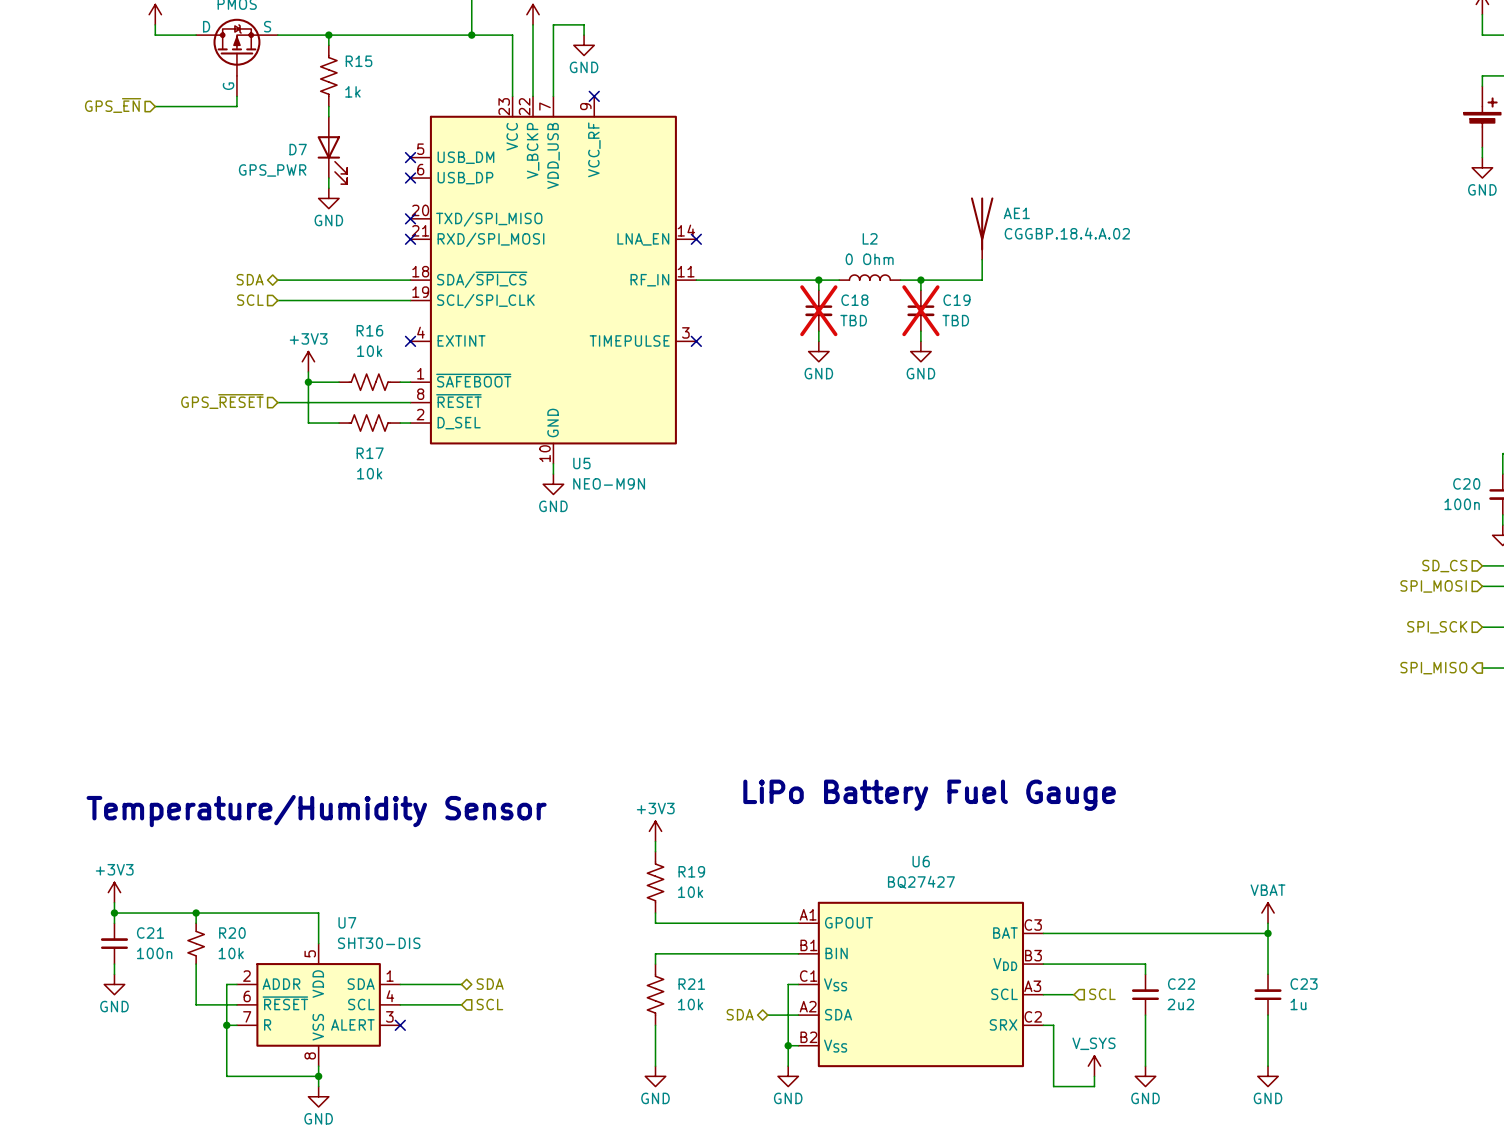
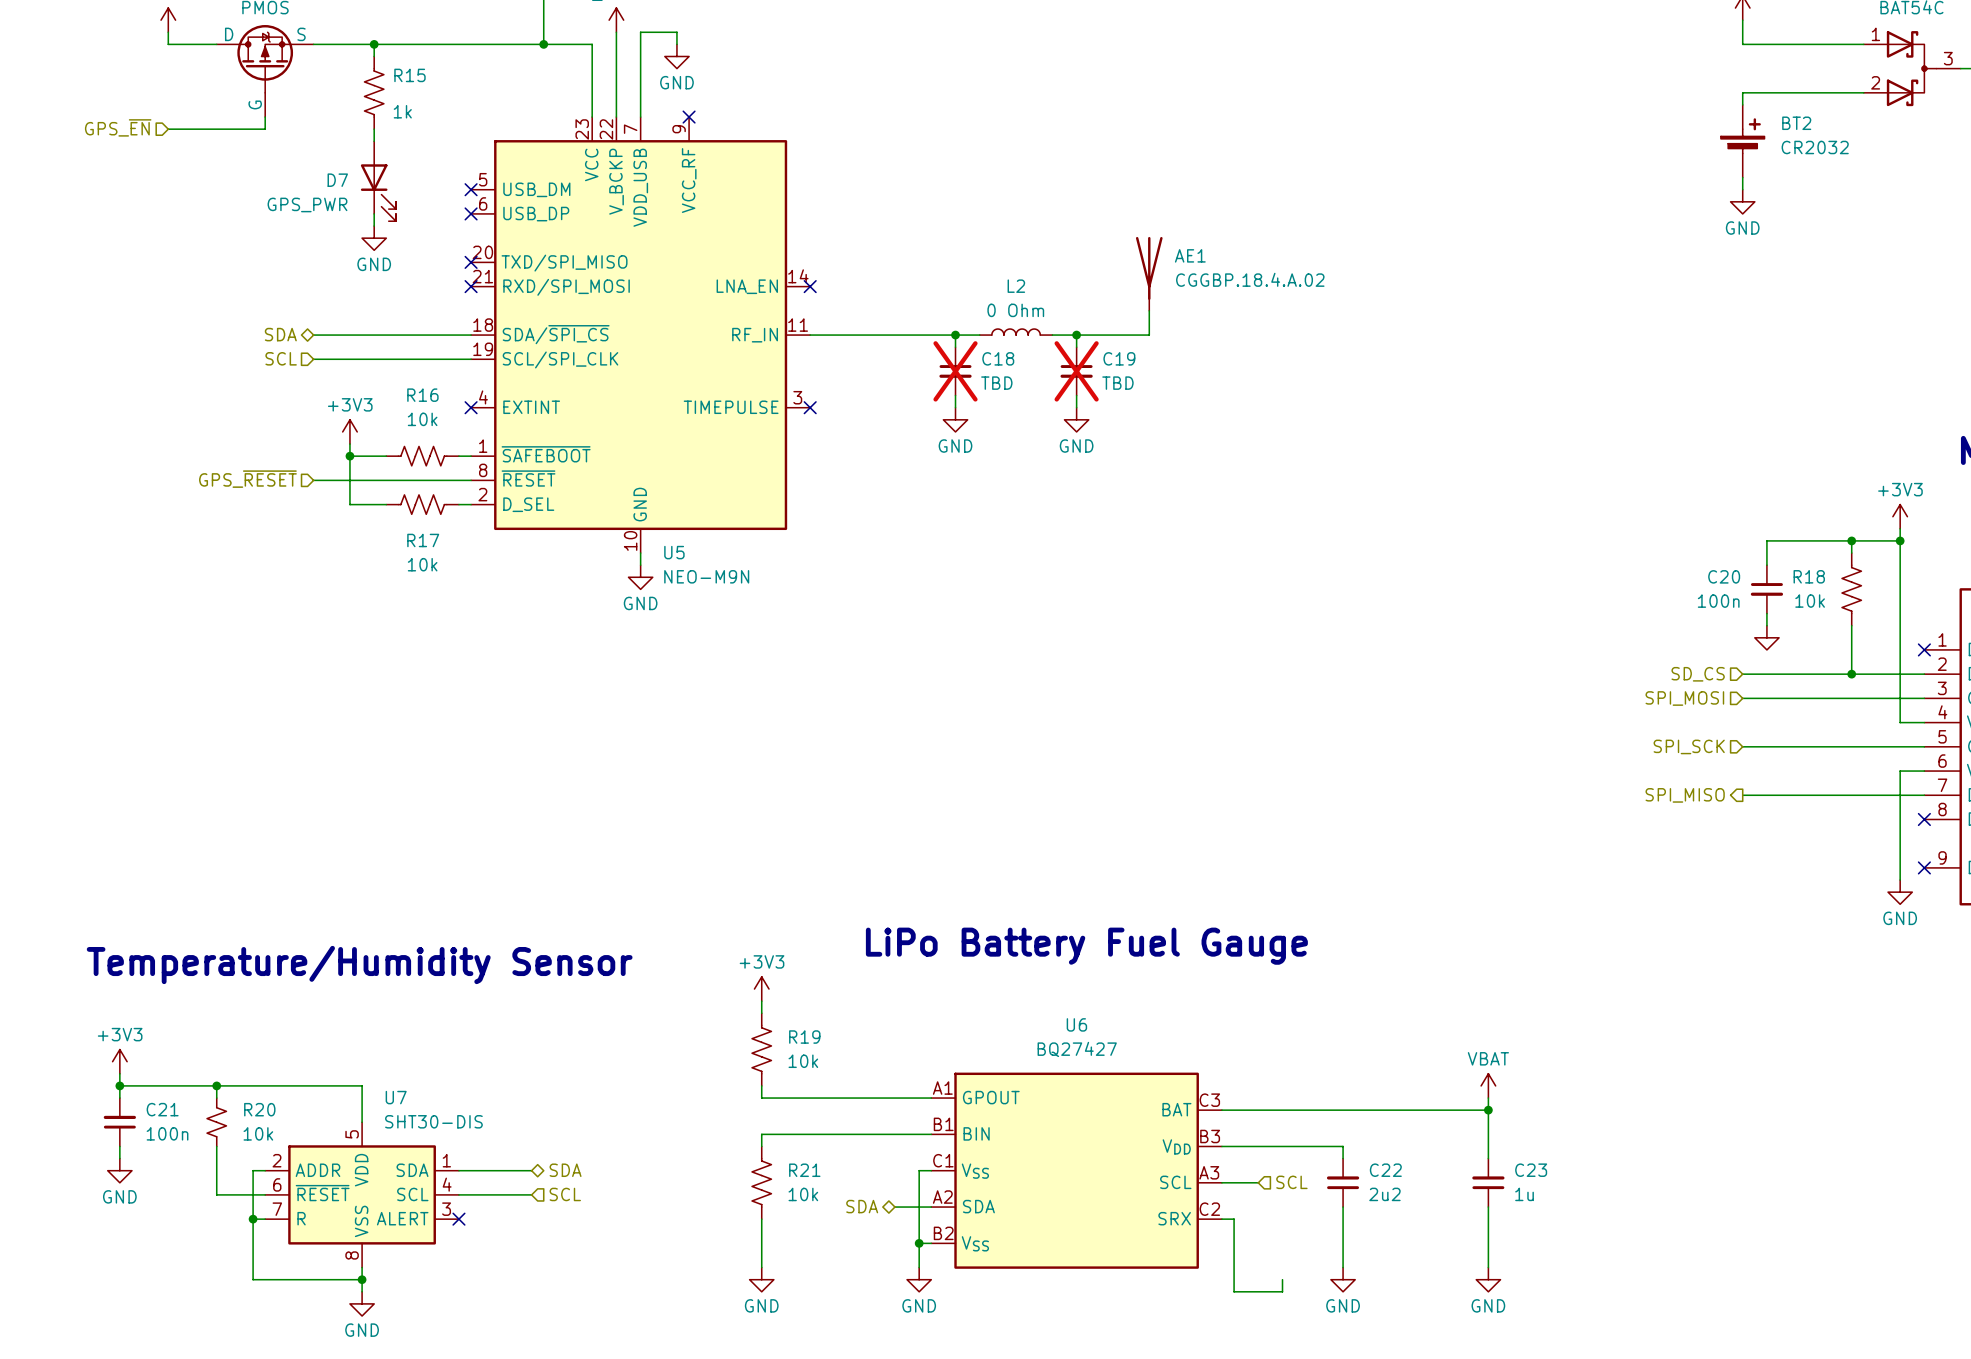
power symbol: V_SYS (1094, 1066) -> none

